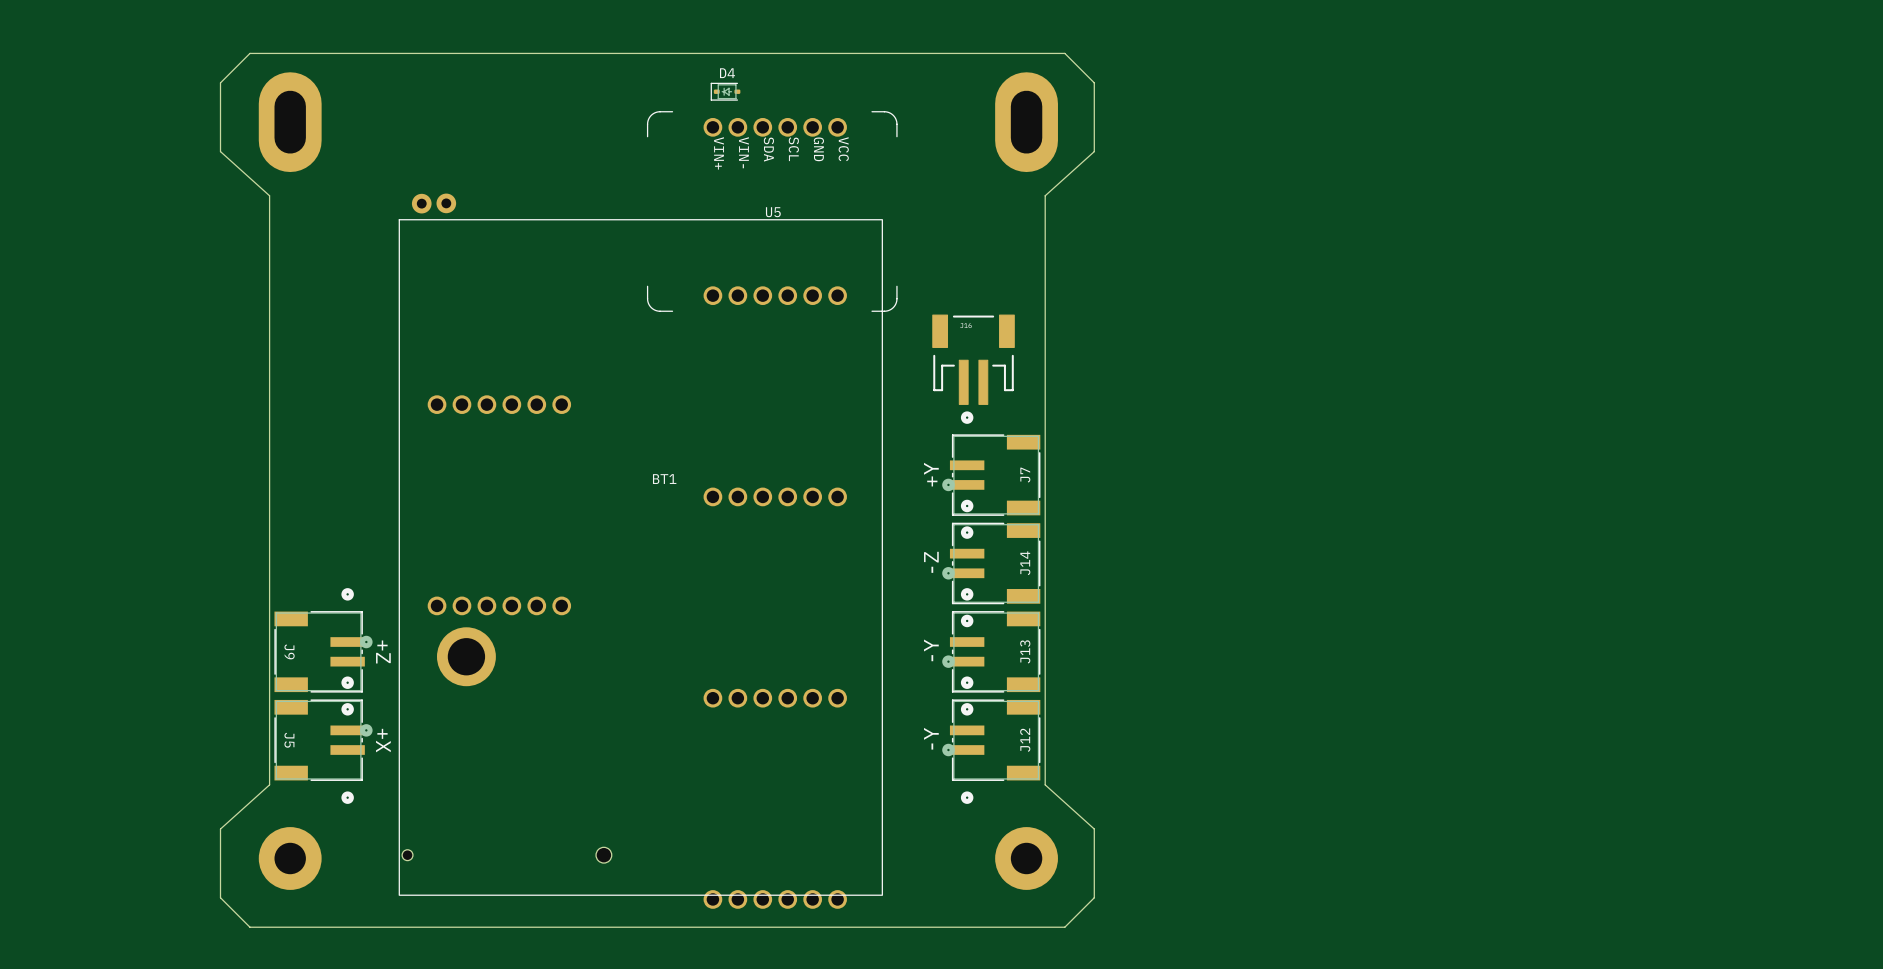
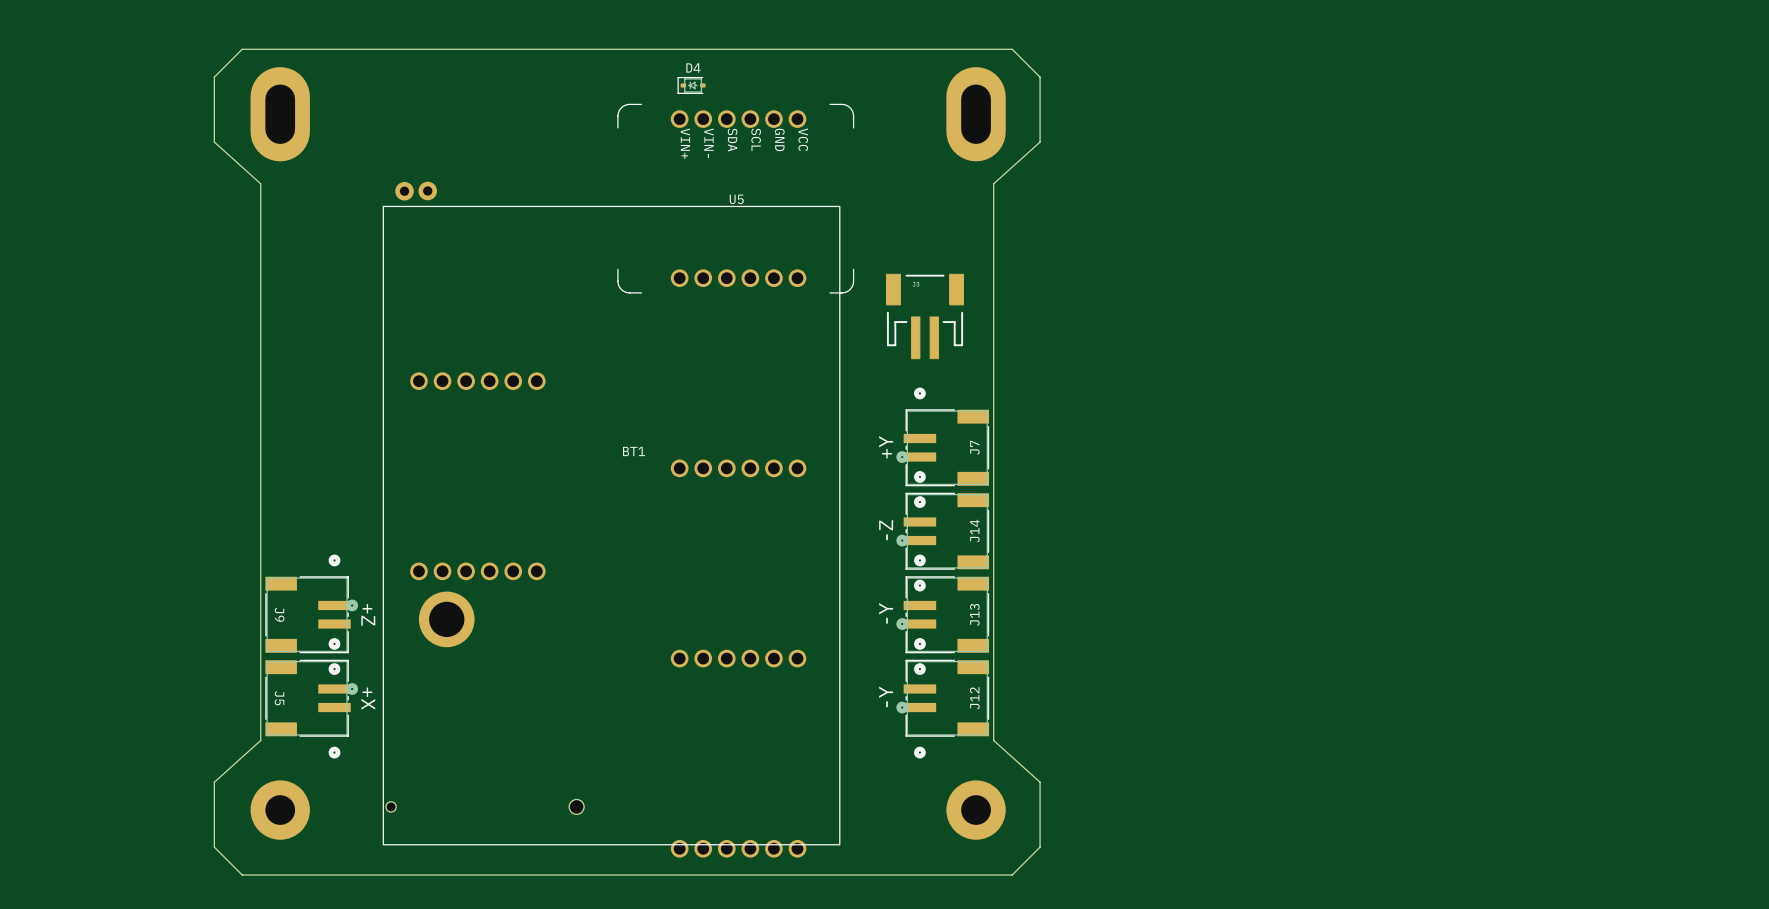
part: none -> (925, 316)
part: (973, 359) -> none

